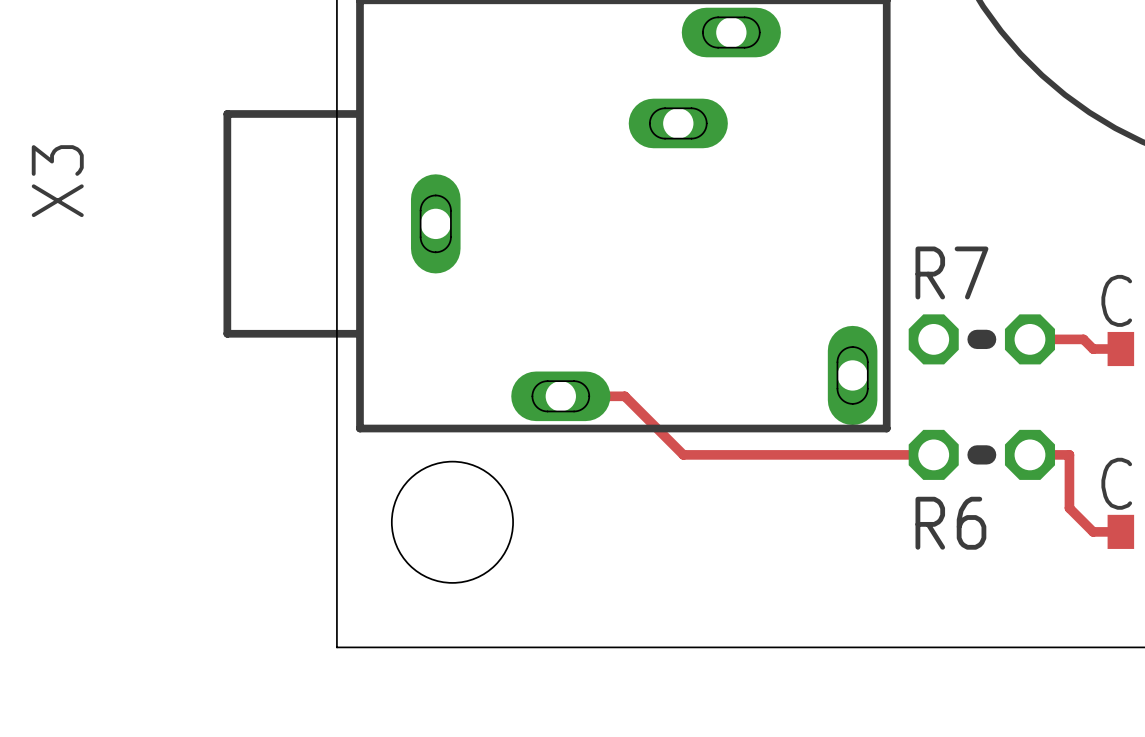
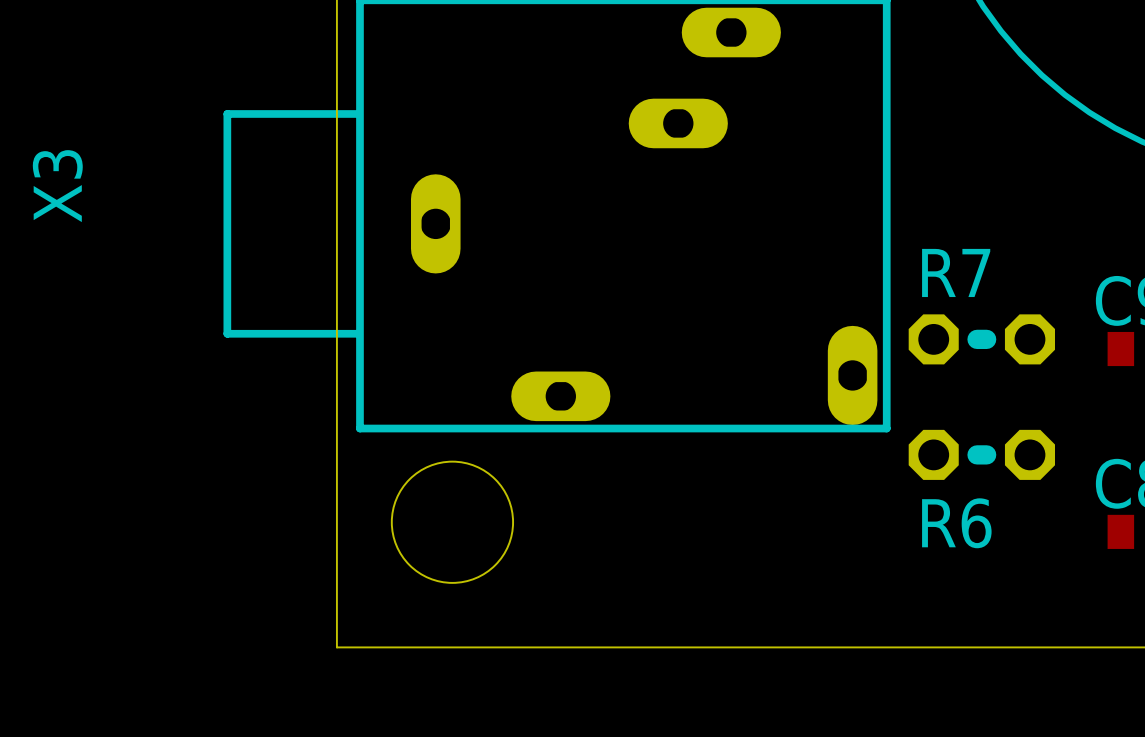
track: (1029, 339) (1083, 339) (1093, 349) (1120, 349) -> none
track: (560, 396) (624, 396) (683, 454) (933, 454) -> none
track: (1029, 454) (1069, 454) (1069, 508) (1093, 531) (1120, 531) -> none

